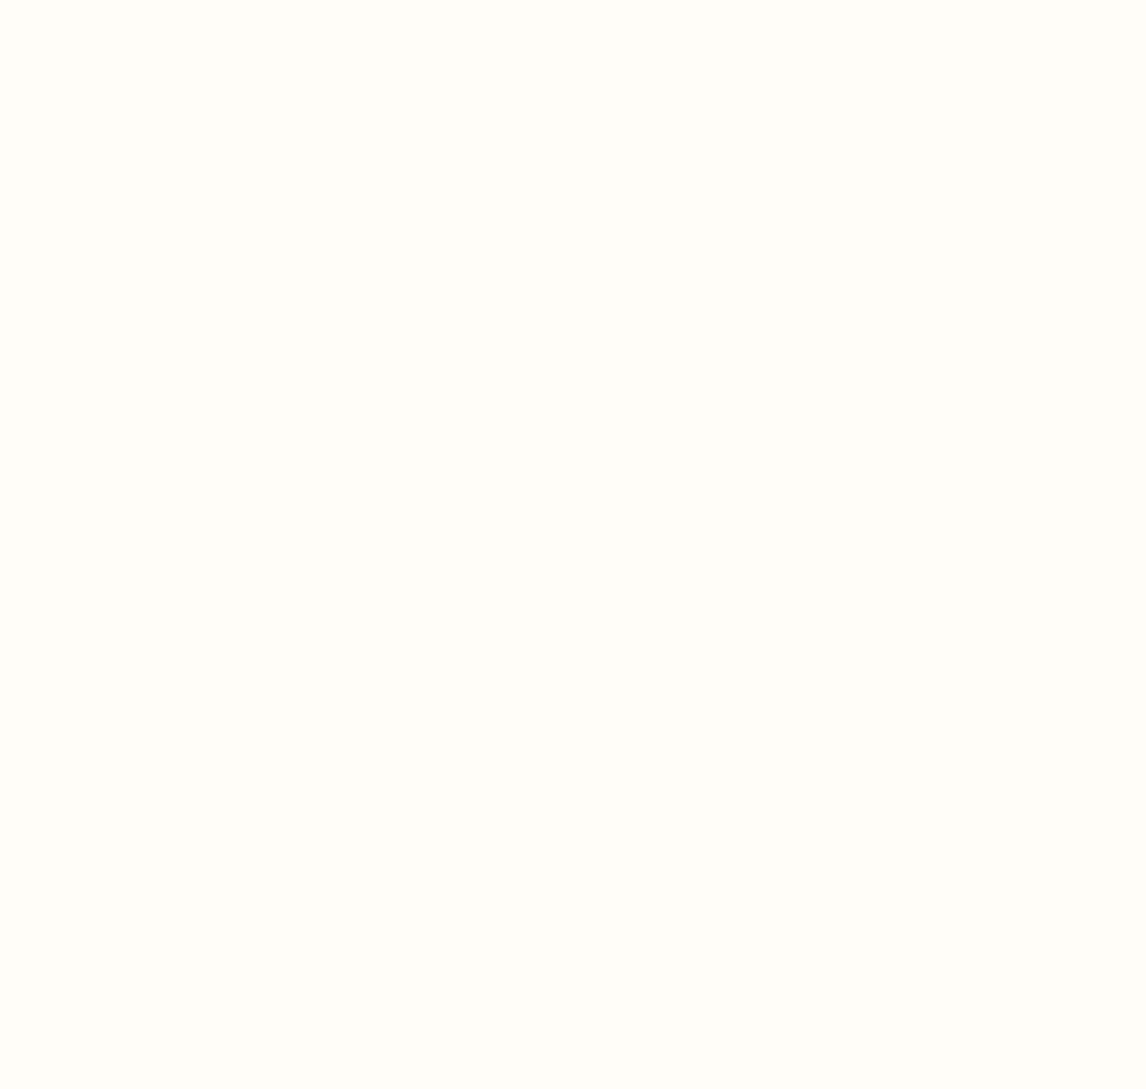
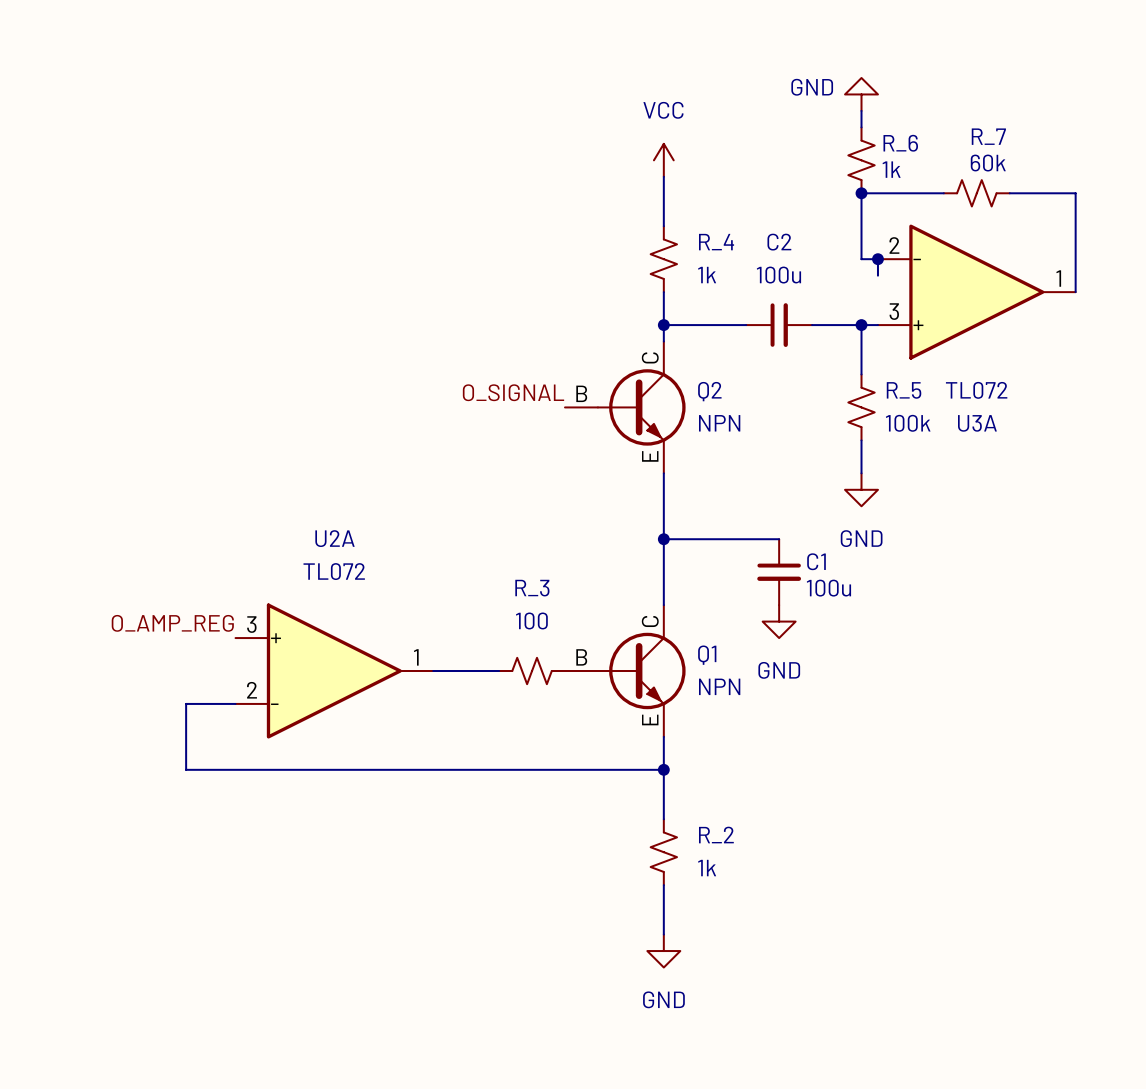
power symbol: none -> GND (861, 94)
wire: none -> (861, 110) (861, 127)
power symbol: none -> VCC (663, 160)
R_6: none -> 1k (861, 160)
wire: none -> (663, 176) (663, 226)
junction: none -> (861, 193)
wire: none -> (943, 193) (861, 193) (861, 259) (877, 259) (877, 275)
R_7: none -> 60k (976, 193)
wire: none -> (1009, 193) (1075, 193) (1075, 292)
R_4: none -> 1k (663, 259)
junction: none -> (877, 259)
wire: none -> (663, 292) (663, 341)
U3A: none -> TL072 (976, 292)
wire: none -> (663, 325) (746, 325)
junction: none -> (663, 325)
C2: none -> 100u (779, 325)
wire: none -> (812, 325) (877, 325)
wire: none -> (861, 325) (861, 374)
junction: none -> (861, 325)
label: none -> O_SIGNAL (513, 392)
Q2: none -> NPN (625, 407)
R_5: none -> 100k (861, 407)
wire: none -> (861, 440) (861, 473)
wire: none -> (663, 473) (663, 605)
power symbol: none -> GND (861, 489)
wire: none -> (663, 539) (779, 539)
junction: none -> (663, 539)
C1: none -> 100u (779, 572)
power symbol: none -> GND (779, 621)
label: none -> O_AMP_REG (172, 623)
U2A: none -> TL072 (334, 671)
wire: none -> (433, 671) (499, 671)
R_3: none -> 100 (532, 671)
Q1: none -> NPN (625, 671)
wire: none -> (235, 703) (186, 703) (186, 769) (663, 769)
wire: none -> (663, 736) (663, 819)
junction: none -> (663, 769)
R_2: none -> 1k (663, 852)
wire: none -> (663, 885) (663, 934)
power symbol: none -> GND (663, 951)

